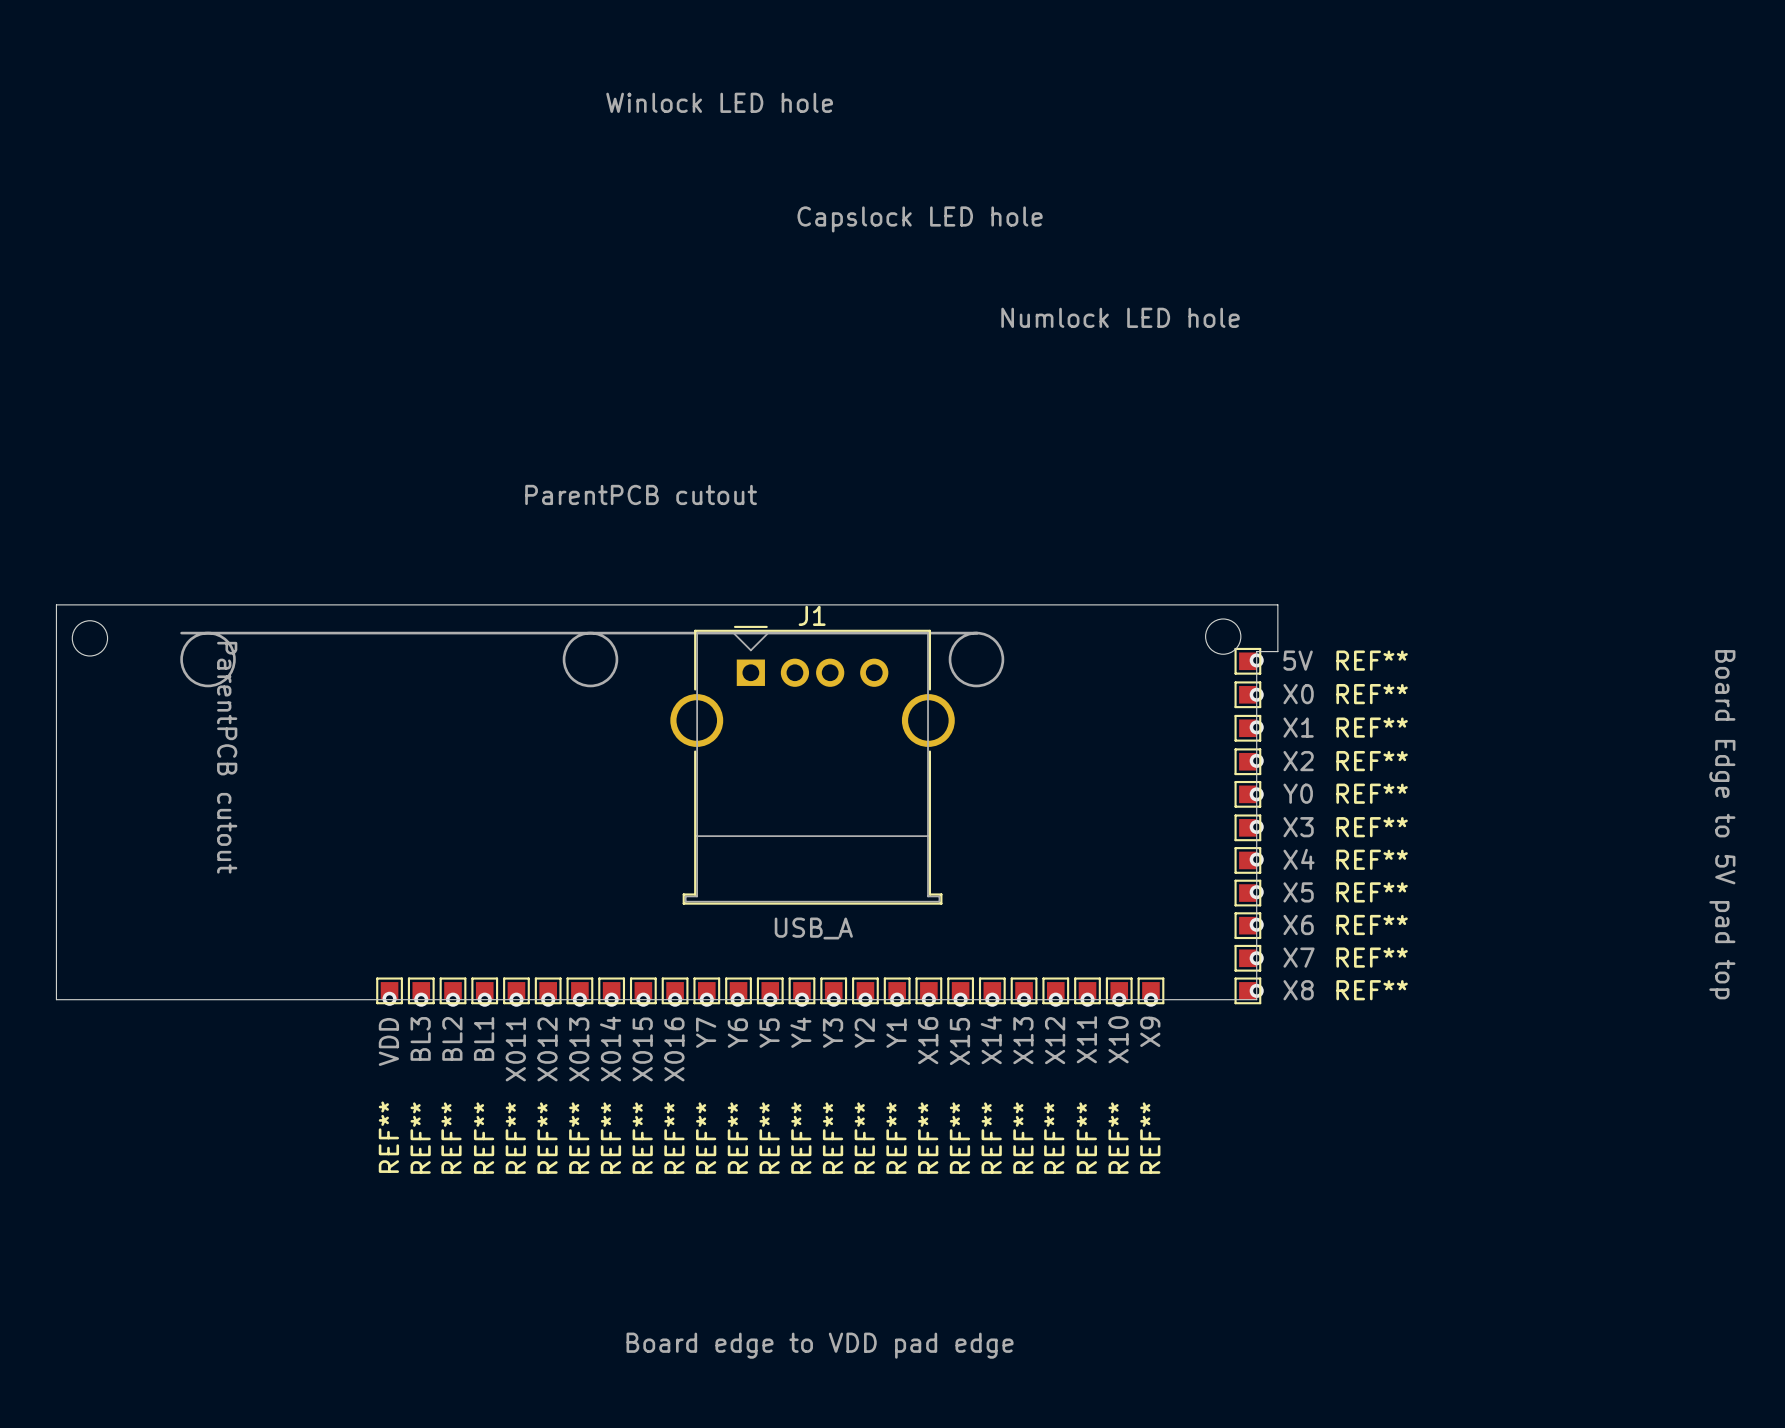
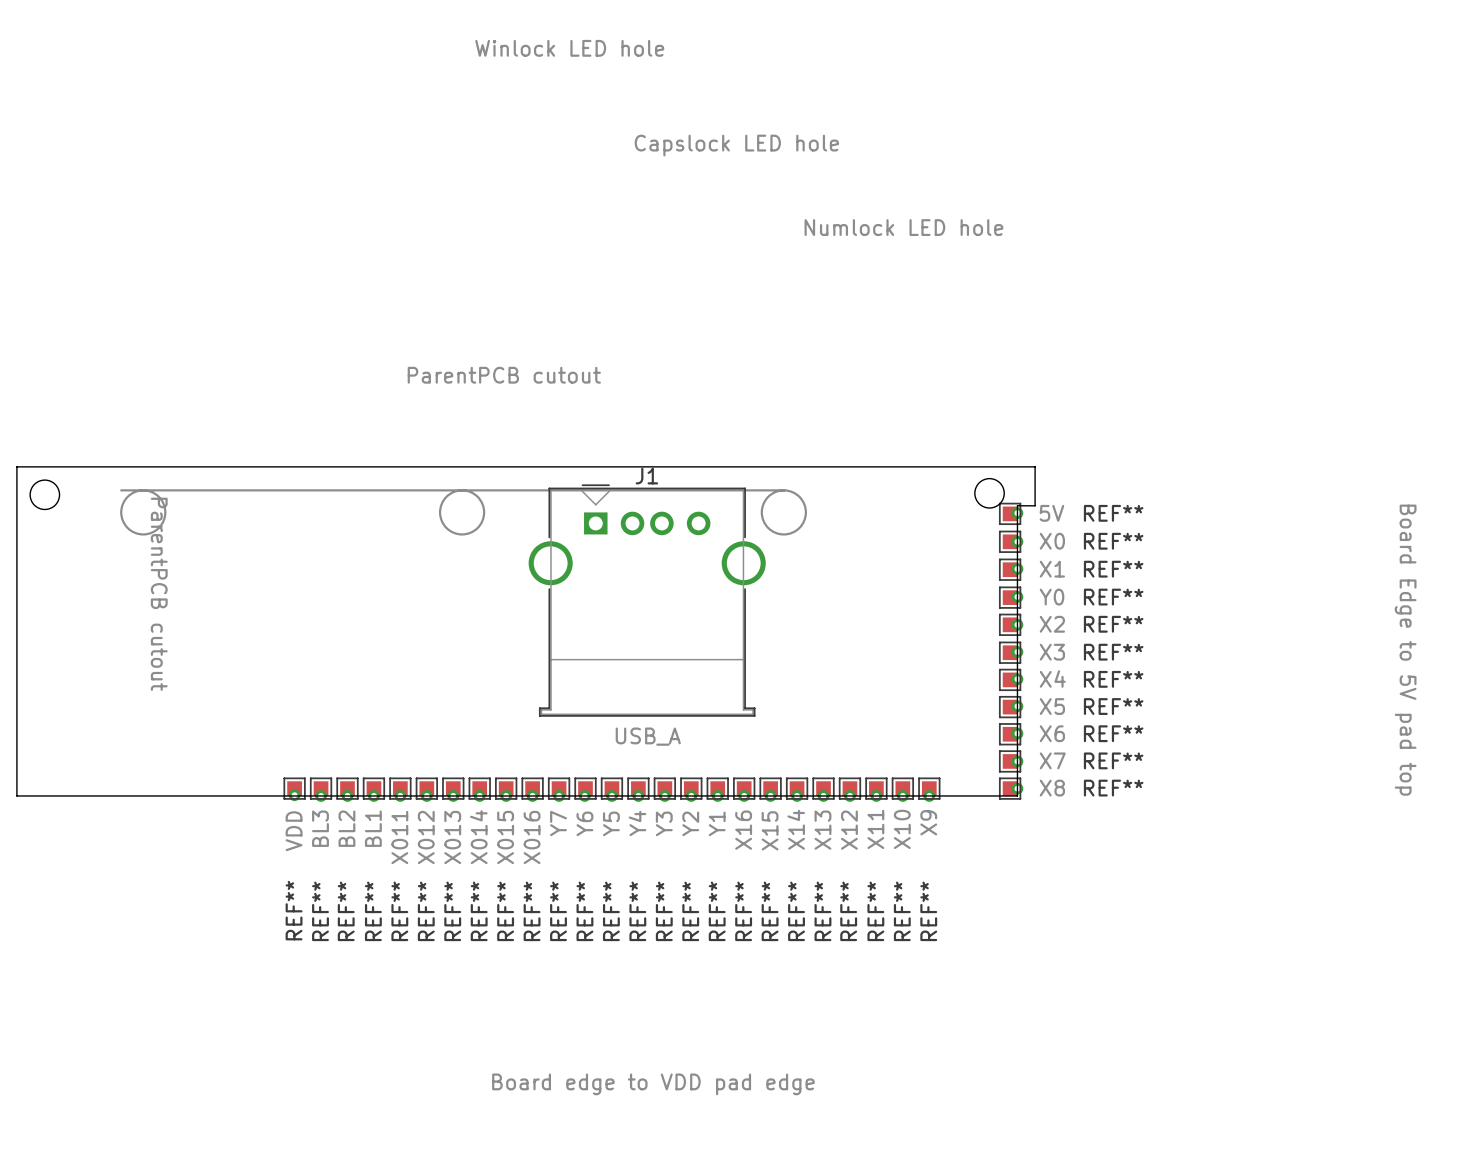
REF** value: X2 (1298, 761) -> Y0 (1052, 597)
REF** value: Y0 (1298, 793) -> X2 (1052, 624)

